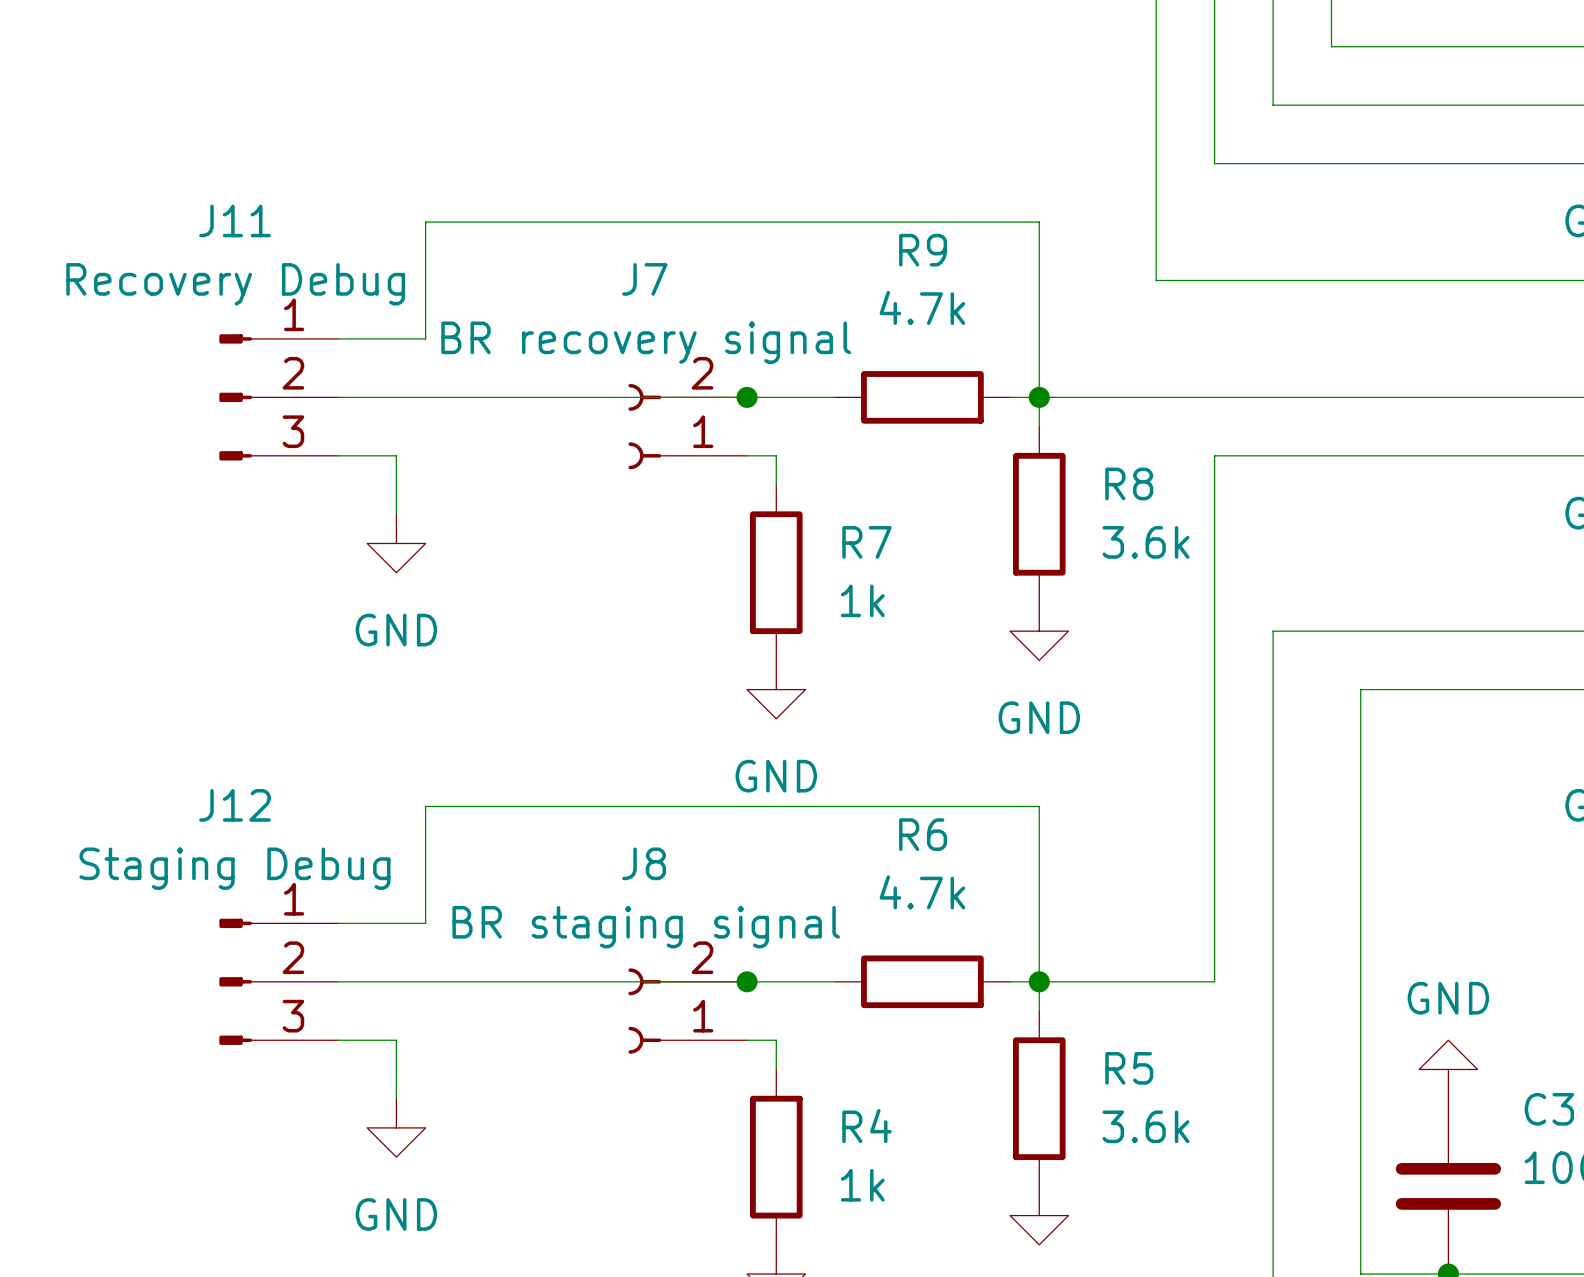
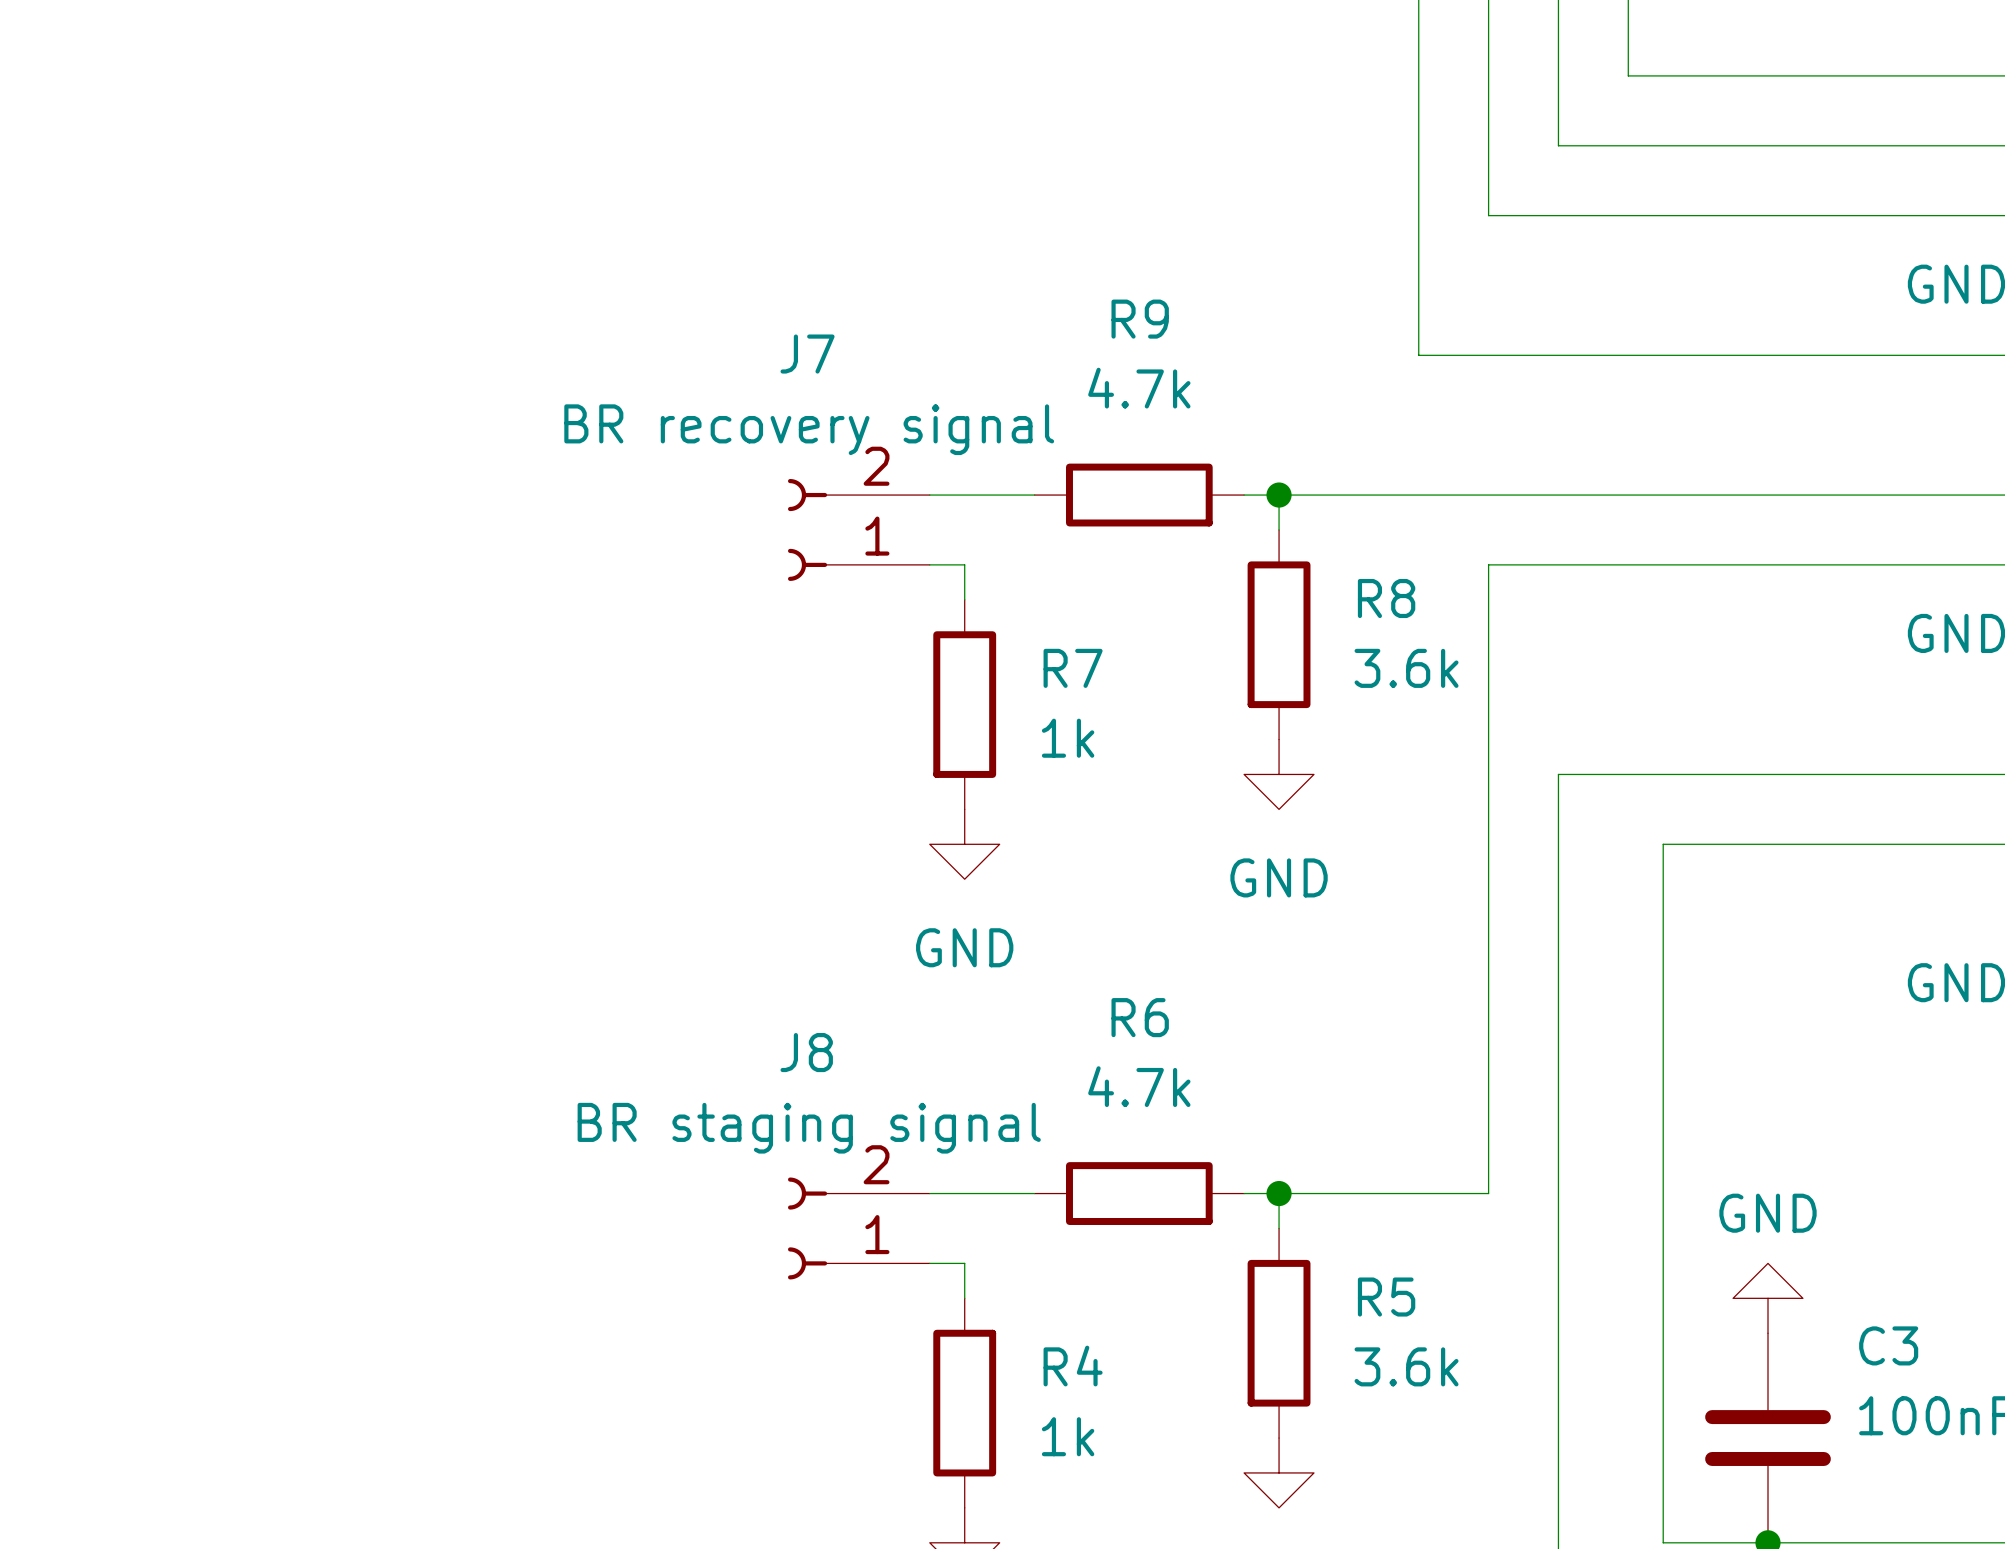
wire: (337, 338) (425, 338) (425, 222) (1039, 222) (1039, 397) -> none
J11: Recovery Debug (278, 397) -> none
wire: (337, 397) (747, 397) -> none
junction: (747, 397) -> none
wire: (337, 455) (396, 455) (396, 514) -> none
power symbol: GND (396, 543) -> none
wire: (337, 923) (425, 923) (425, 806) (1039, 806) (1039, 981) -> none
J12: Staging Debug (278, 981) -> none
wire: (337, 981) (747, 981) -> none
junction: (747, 981) -> none
wire: (337, 1040) (396, 1040) (396, 1098) -> none
power symbol: GND (396, 1127) -> none

